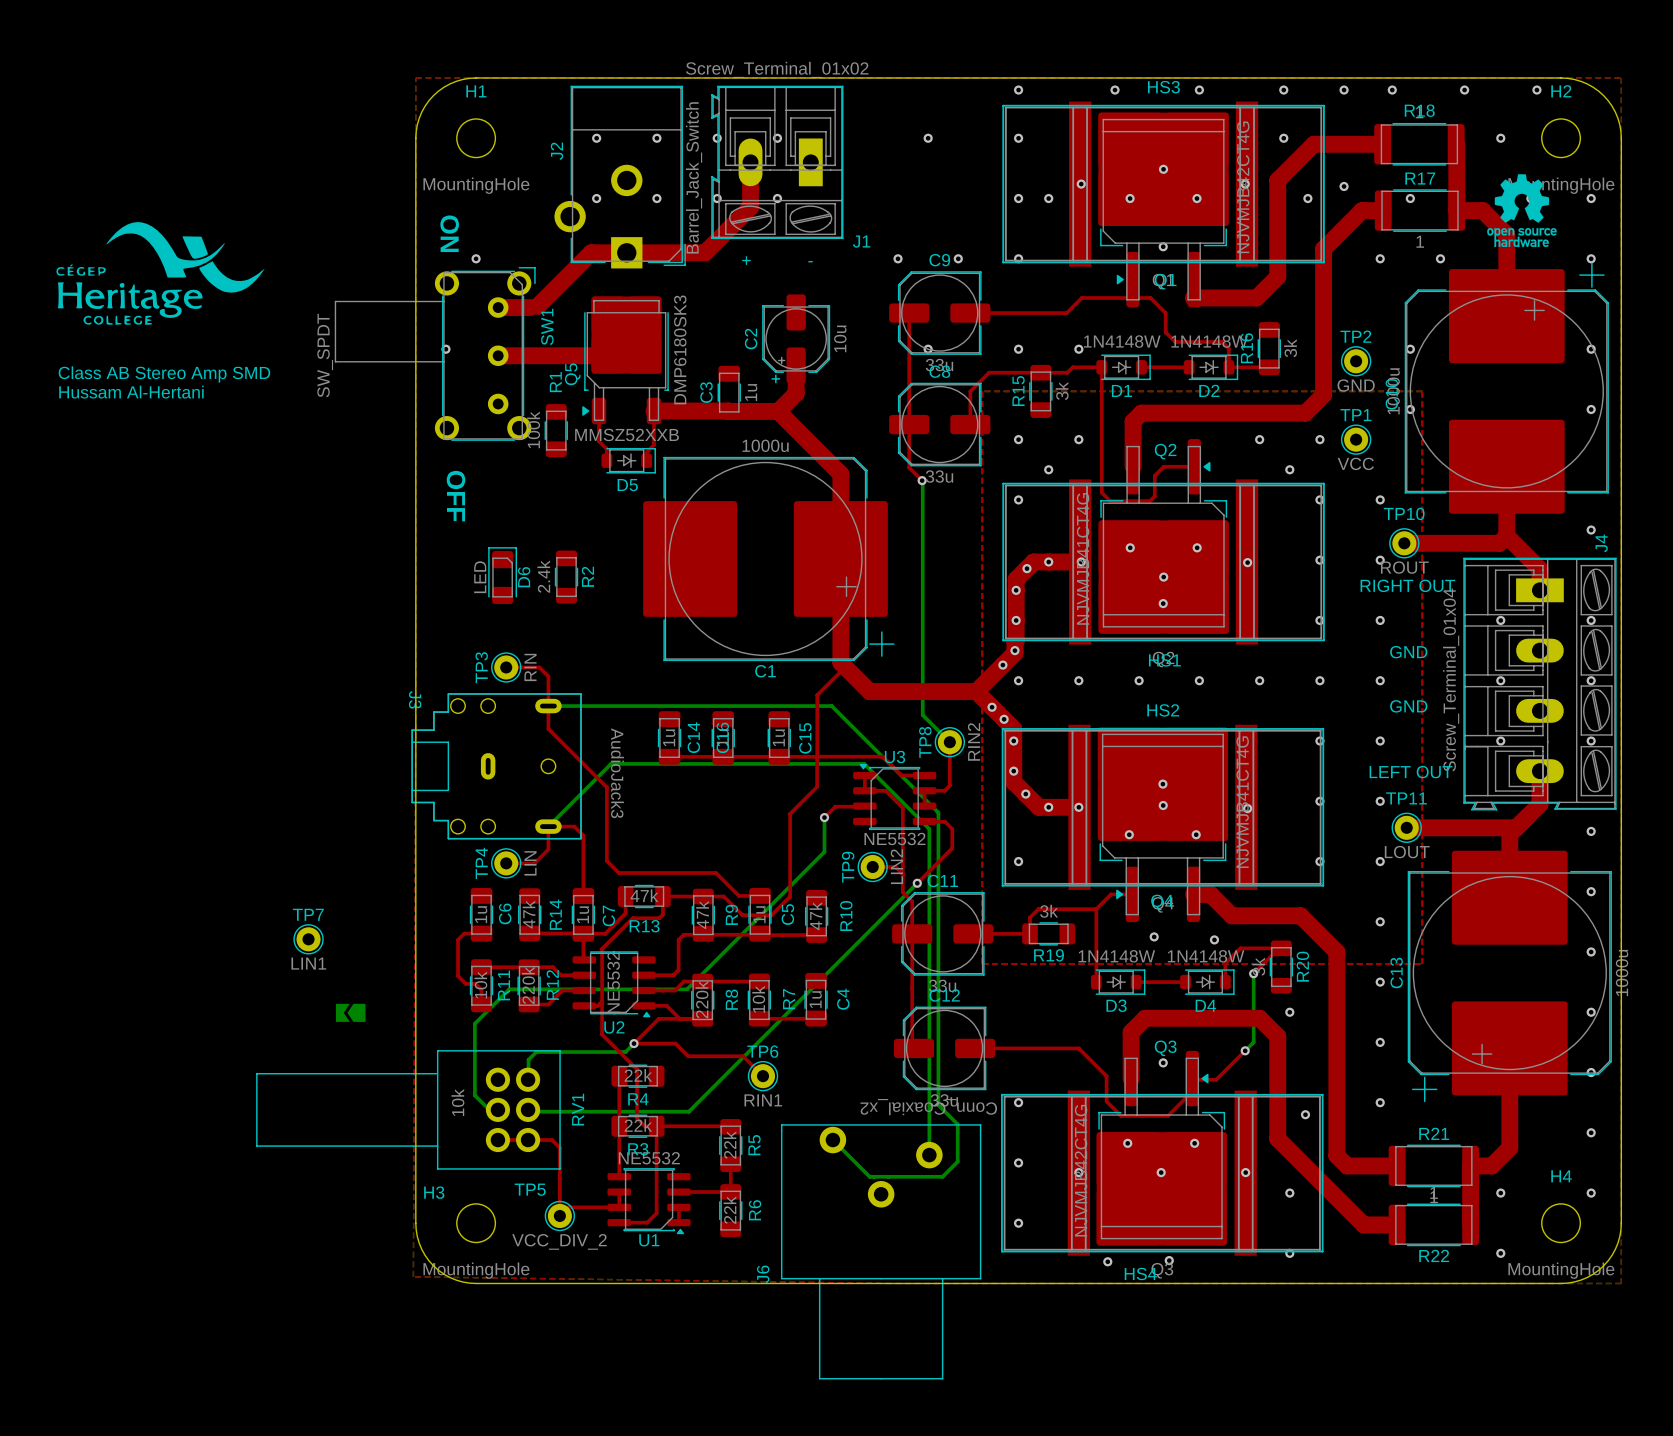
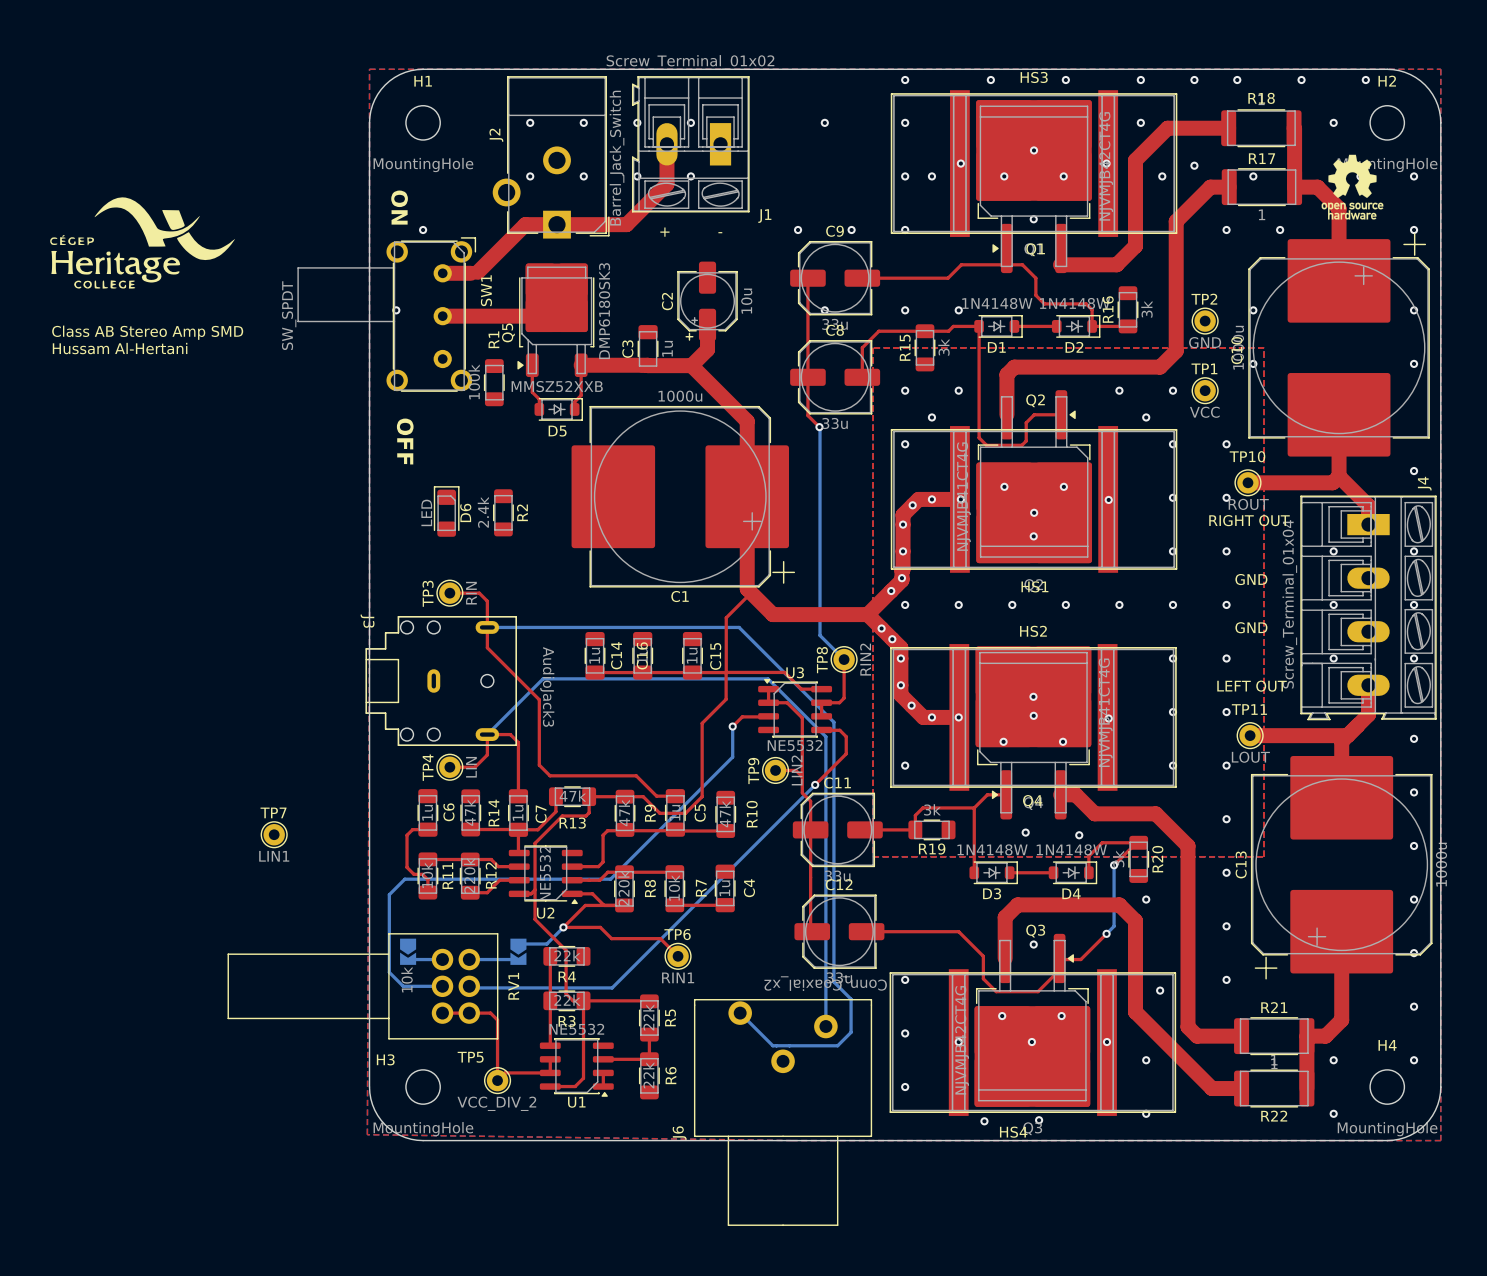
bottom track: (509, 989) (474, 1023) (474, 1095) (489, 1109) -> (452, 879) (404, 879) (389, 894) (389, 972) (403, 986) (434, 986)
part: (350, 1012) -> none
bottom track: (625, 1052) (536, 1052) (528, 1059) (528, 1079) -> (555, 934) (546, 944) (518, 944)
part: none -> (408, 951)
part: none -> (518, 951)
bottom track: none -> (408, 959) (442, 959)
bottom track: none -> (469, 959) (518, 959)

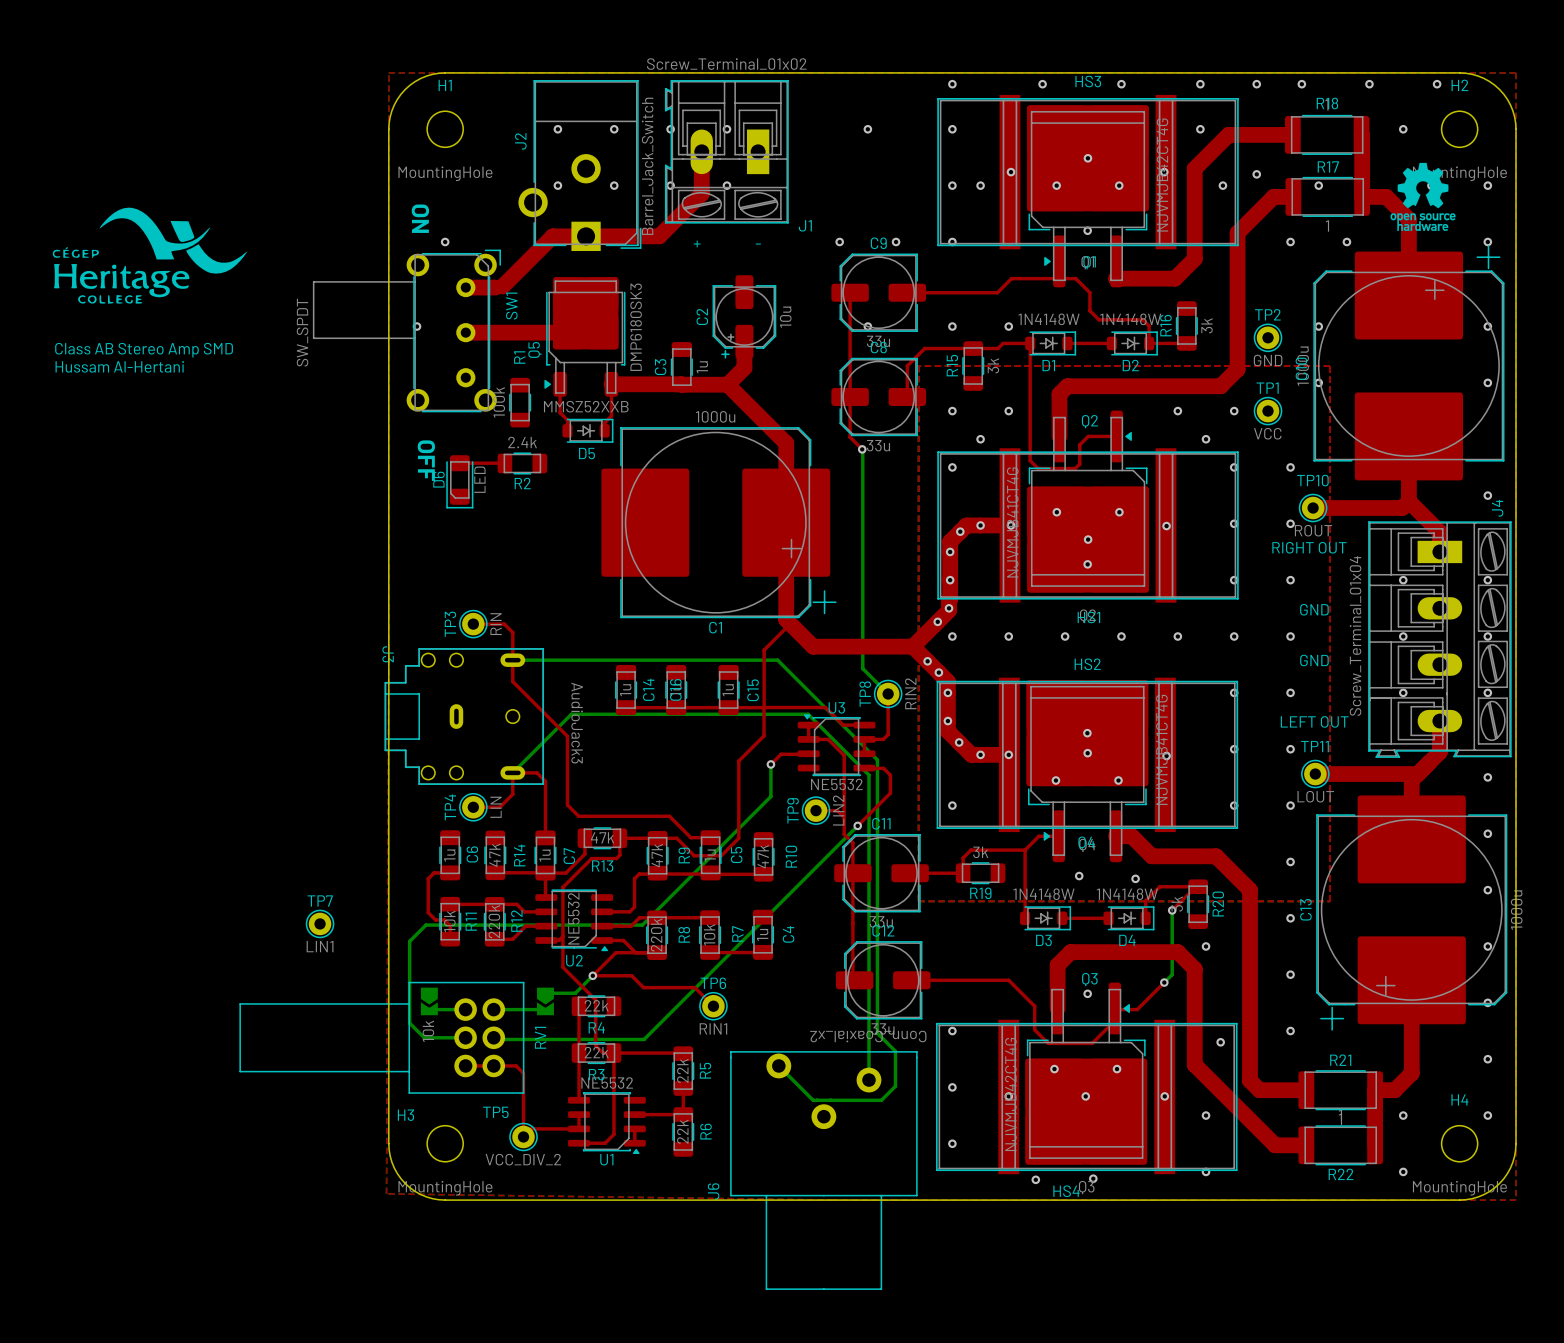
top track: none -> (459, 463) (504, 463)
D6 rotation: 0° (446, 511) -> 180° (459, 481)
D6 position: (446, 511) -> (459, 481)
R2 rotation: 0° (503, 512) -> 90° clockwise (522, 463)
R2 position: (503, 512) -> (522, 463)
TP7 position: (274, 834) -> (320, 923)

